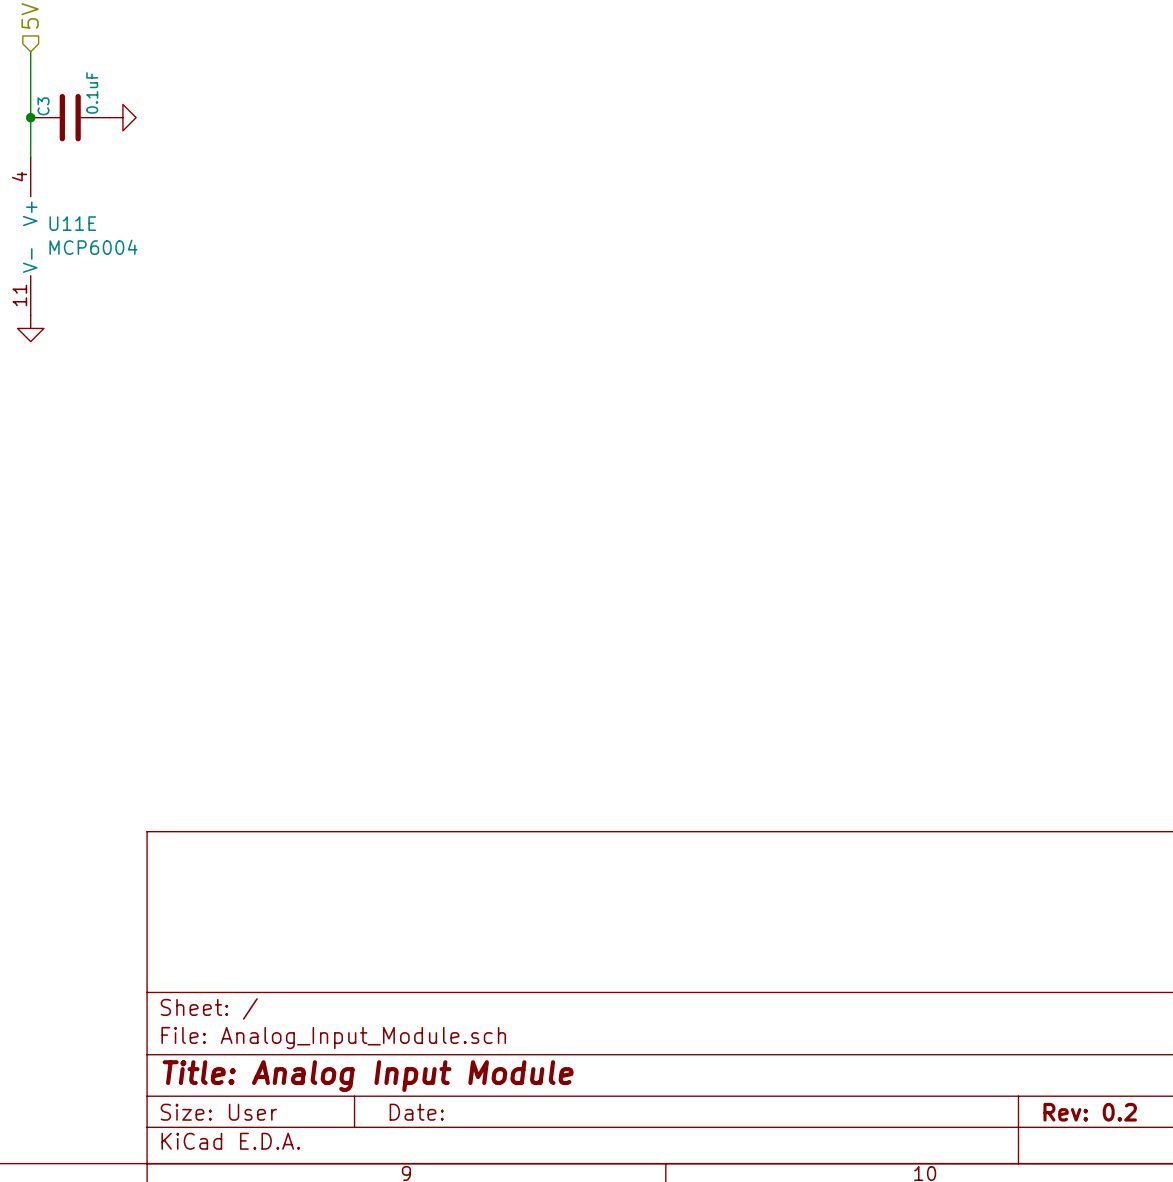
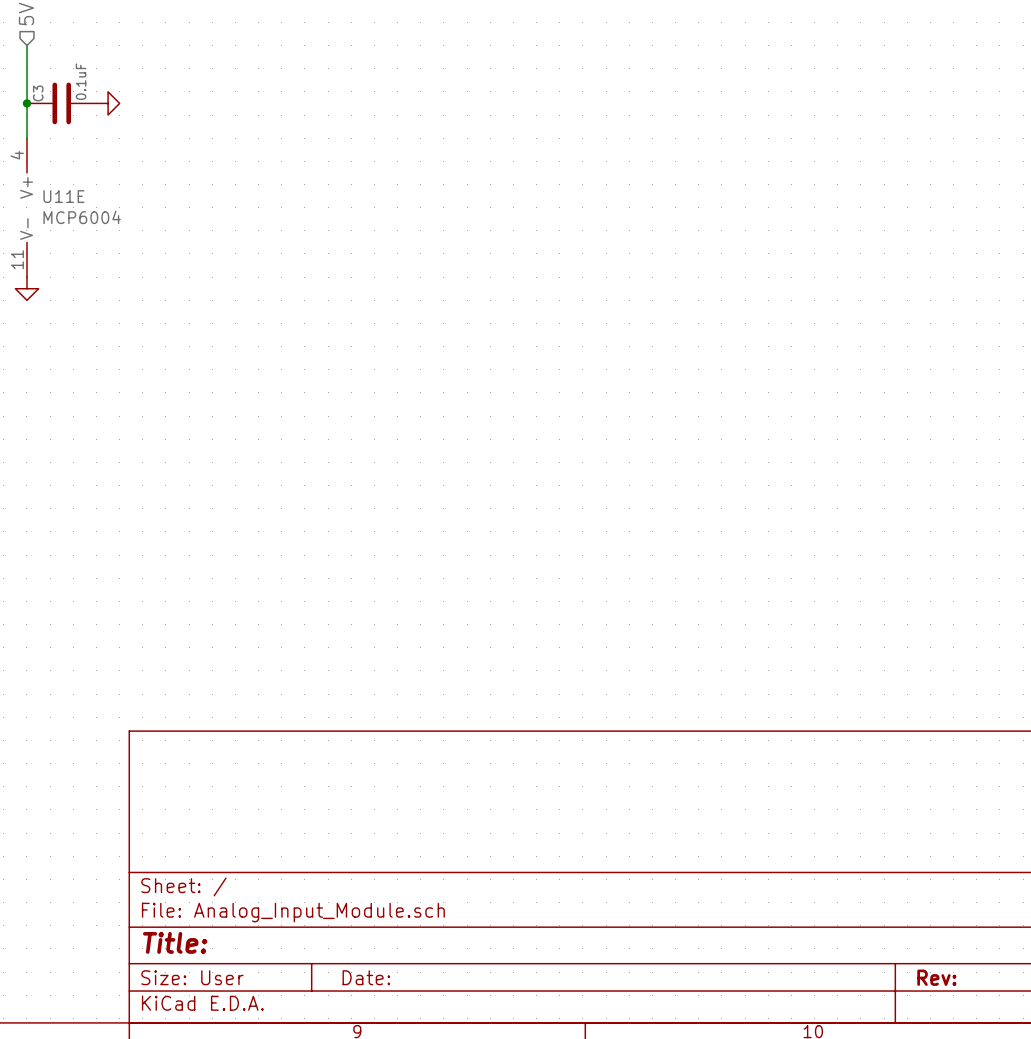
title block: Title: Analog Input Module (368, 1076) -> Title: (175, 942)
title block: Rev: 0.2 (1090, 1112) -> Rev: (936, 977)

